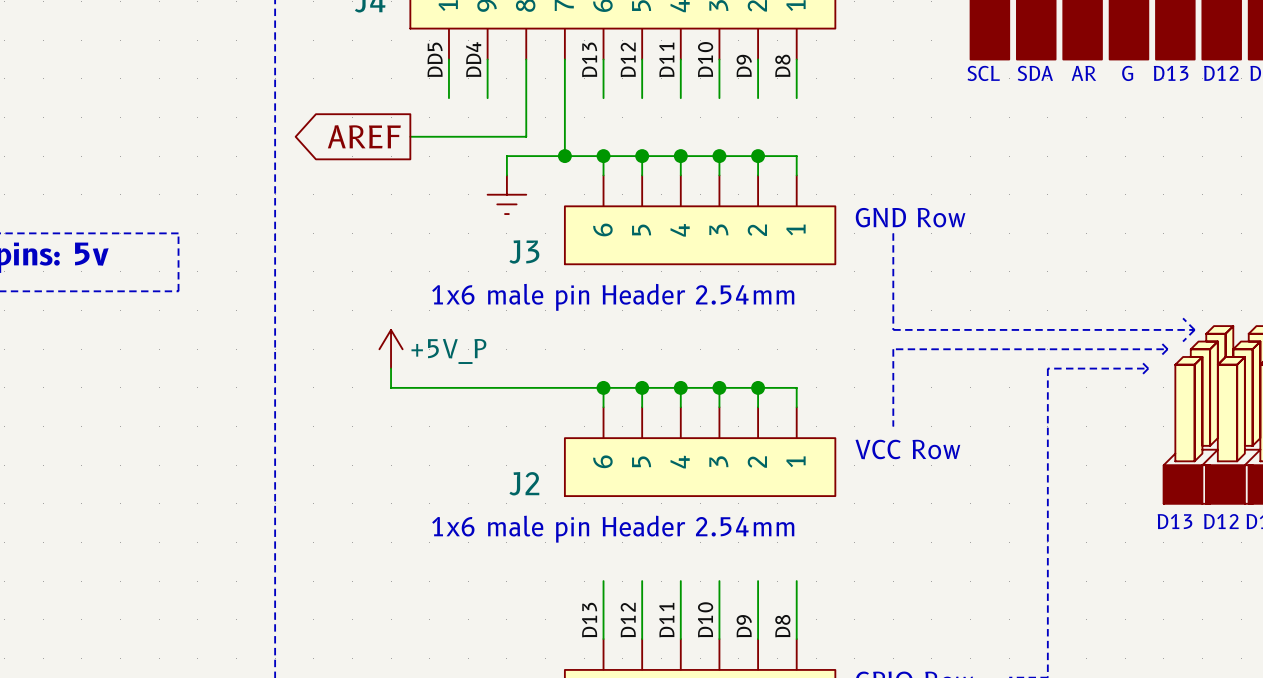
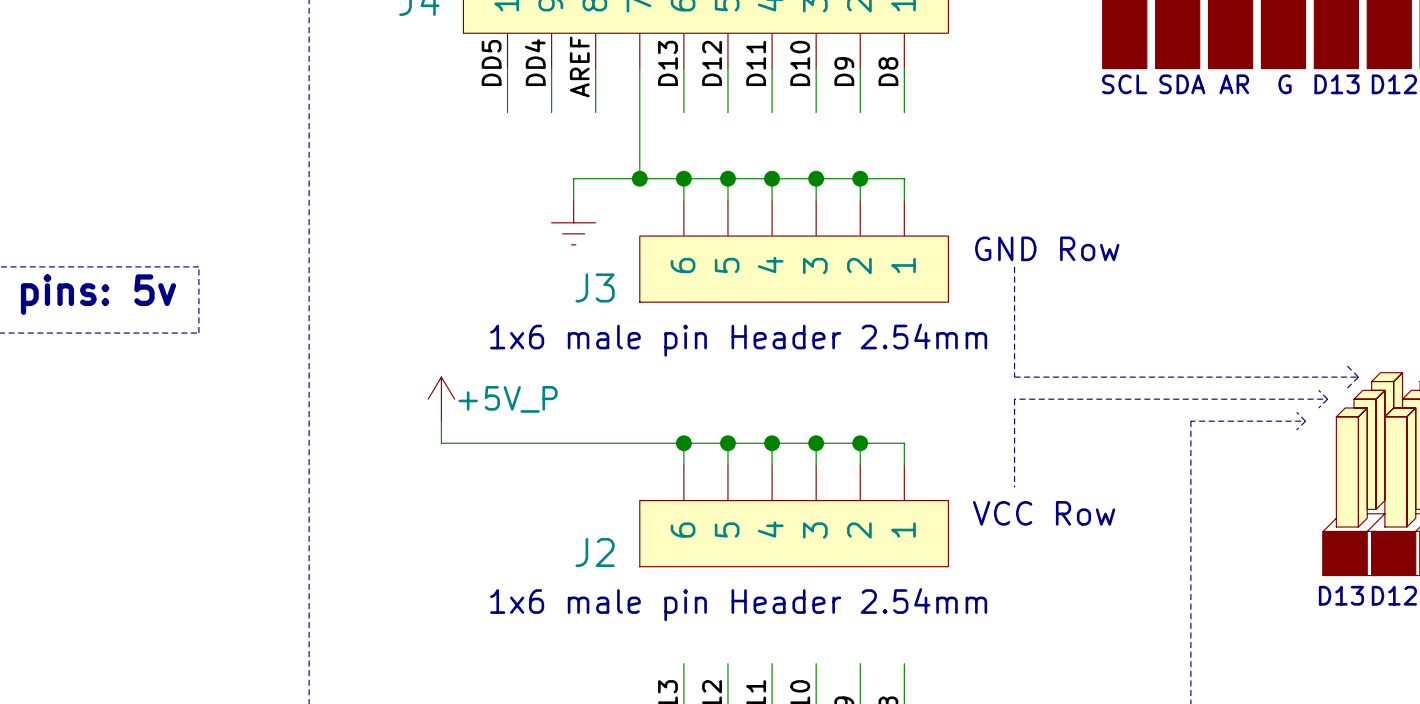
label: none -> AREF (579, 66)
wire: (526, 98) (526, 136) (410, 136) -> none
global label: AREF (364, 136) -> none

